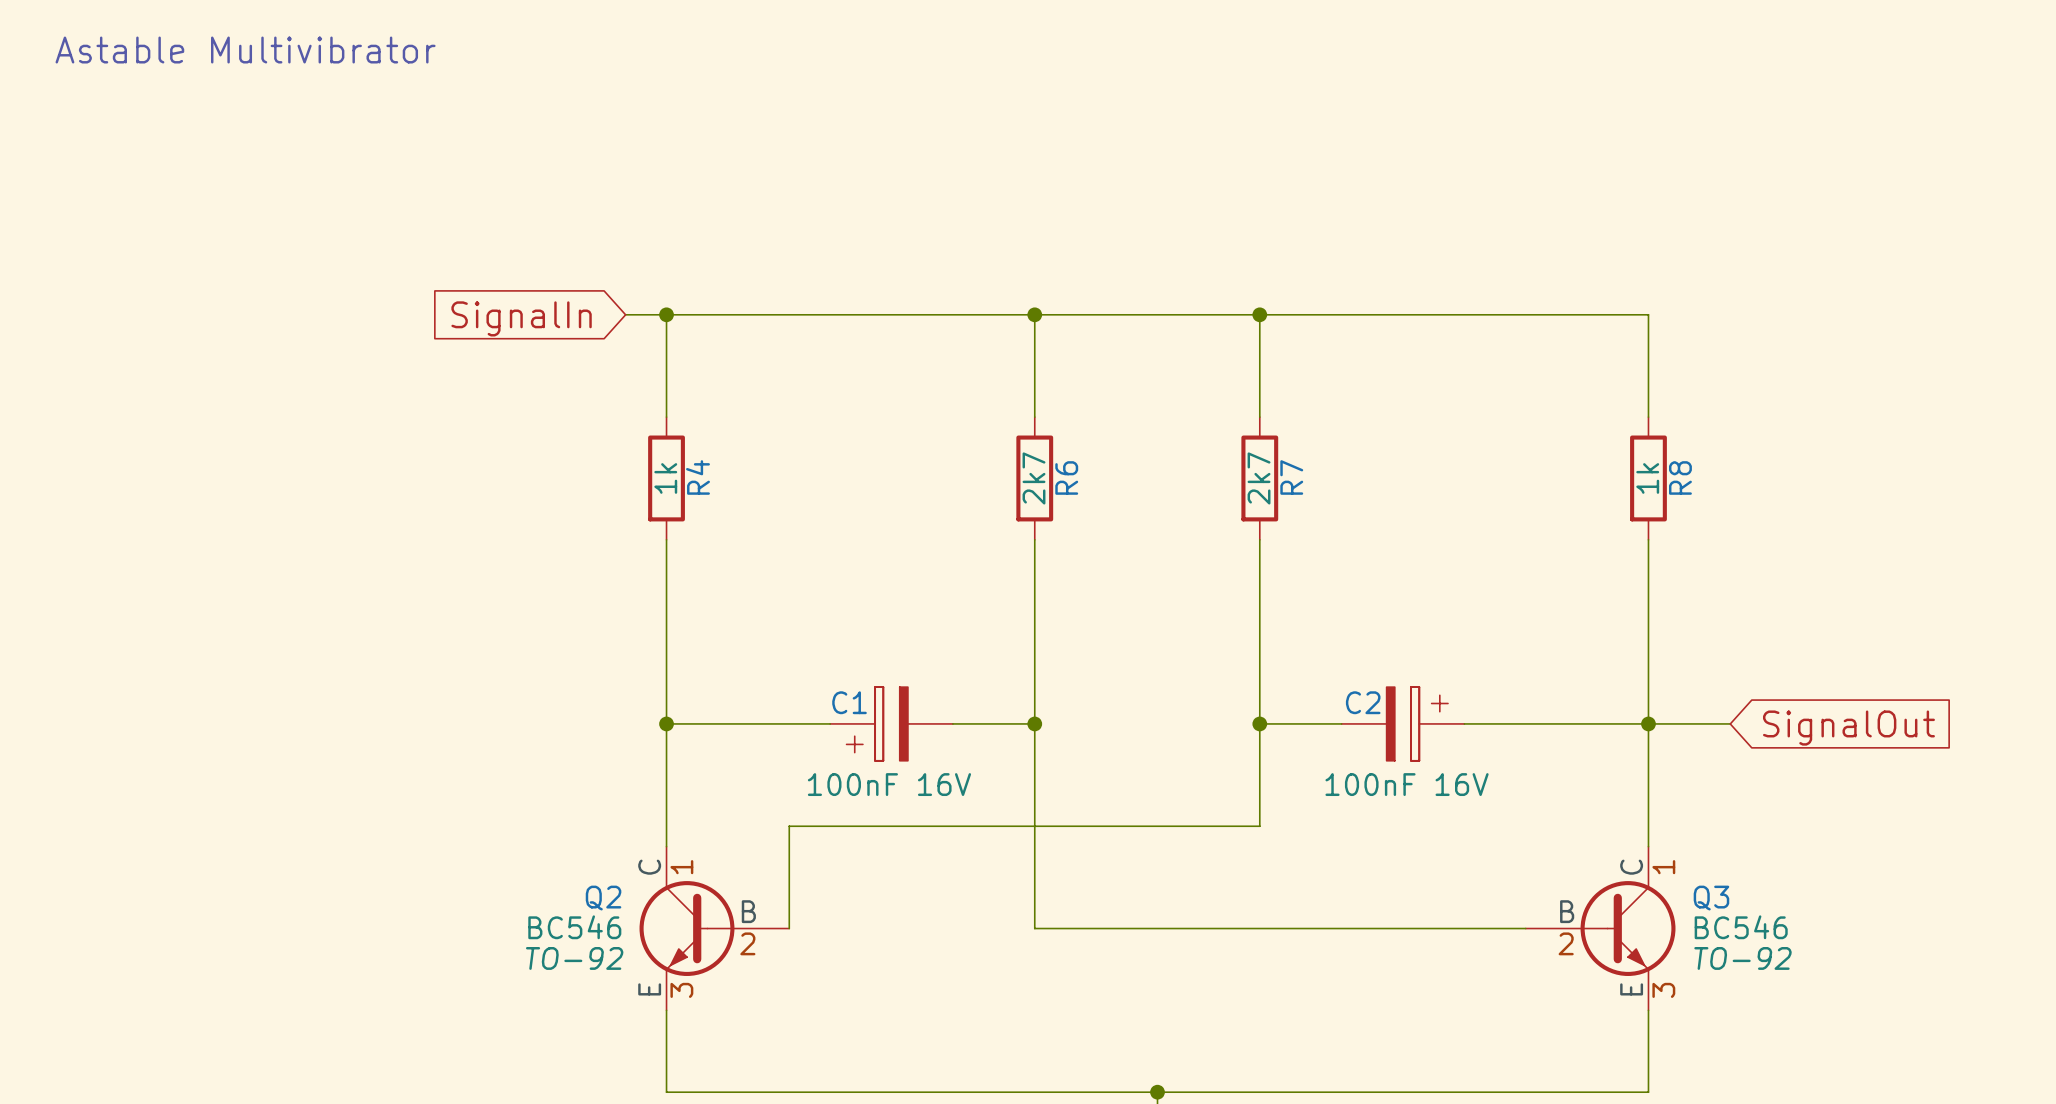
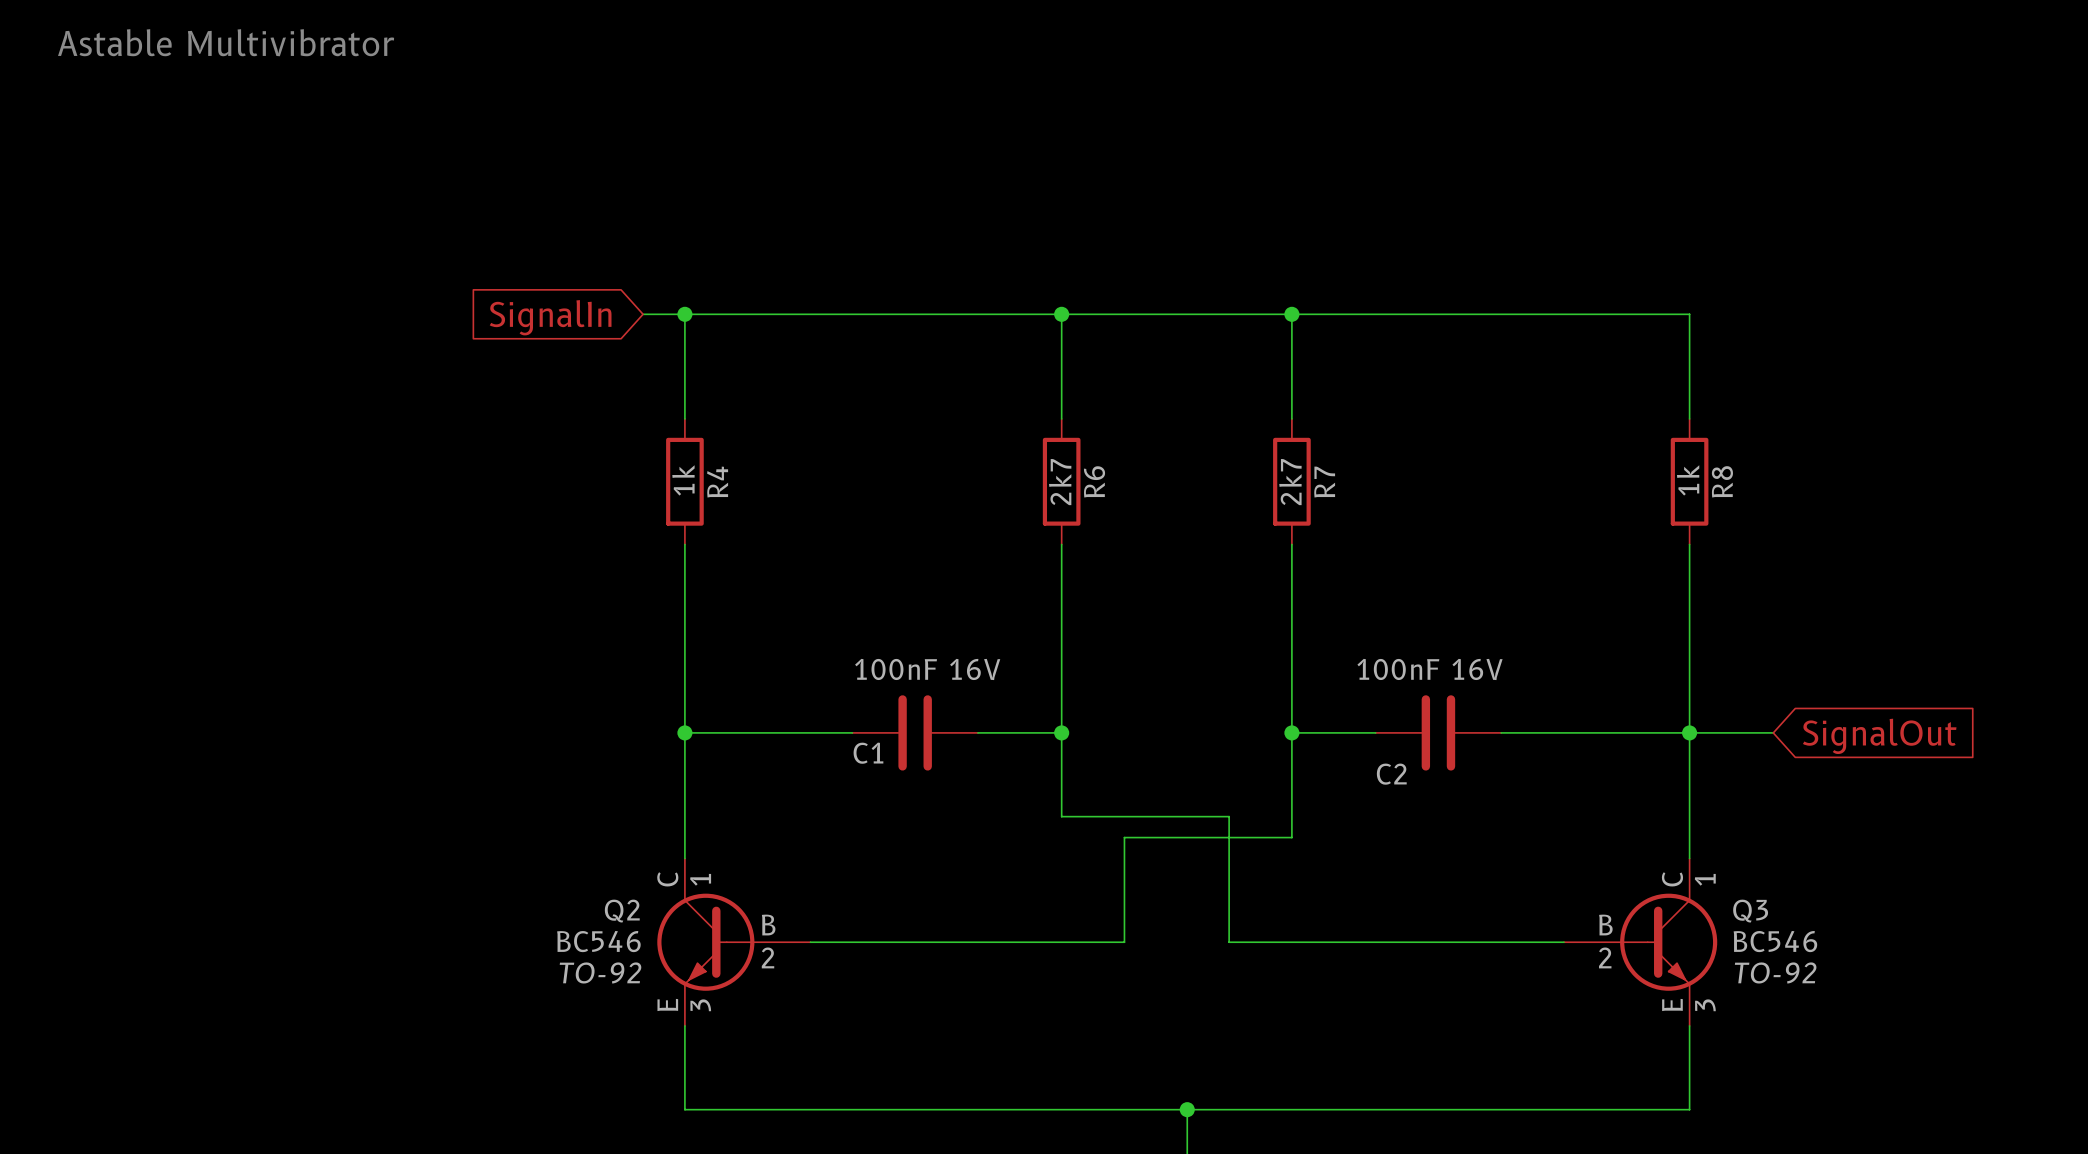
C1 symbol: [830, 687, 953, 761] -> [852, 695, 978, 771]
C2 symbol: [1341, 687, 1465, 761] -> [1375, 695, 1502, 771]
C1 name position: C1 (849, 702) -> C1 (868, 753)
C2 name position: C2 (1363, 702) -> C2 (1391, 774)
C1 value position: 100nF 16V (889, 784) -> 100nF 16V (927, 669)
C2 value position: 100nF 16V (1407, 784) -> 100nF 16V (1430, 669)
wire: (1034, 805) (1034, 928) -> none
wire: (1096, 826) (789, 826) (789, 928) -> (1061, 942) (810, 942)
wire: none -> (1124, 837) (1124, 942)
wire: (1096, 928) (1198, 928) -> (1061, 816) (1229, 816) (1229, 942)

